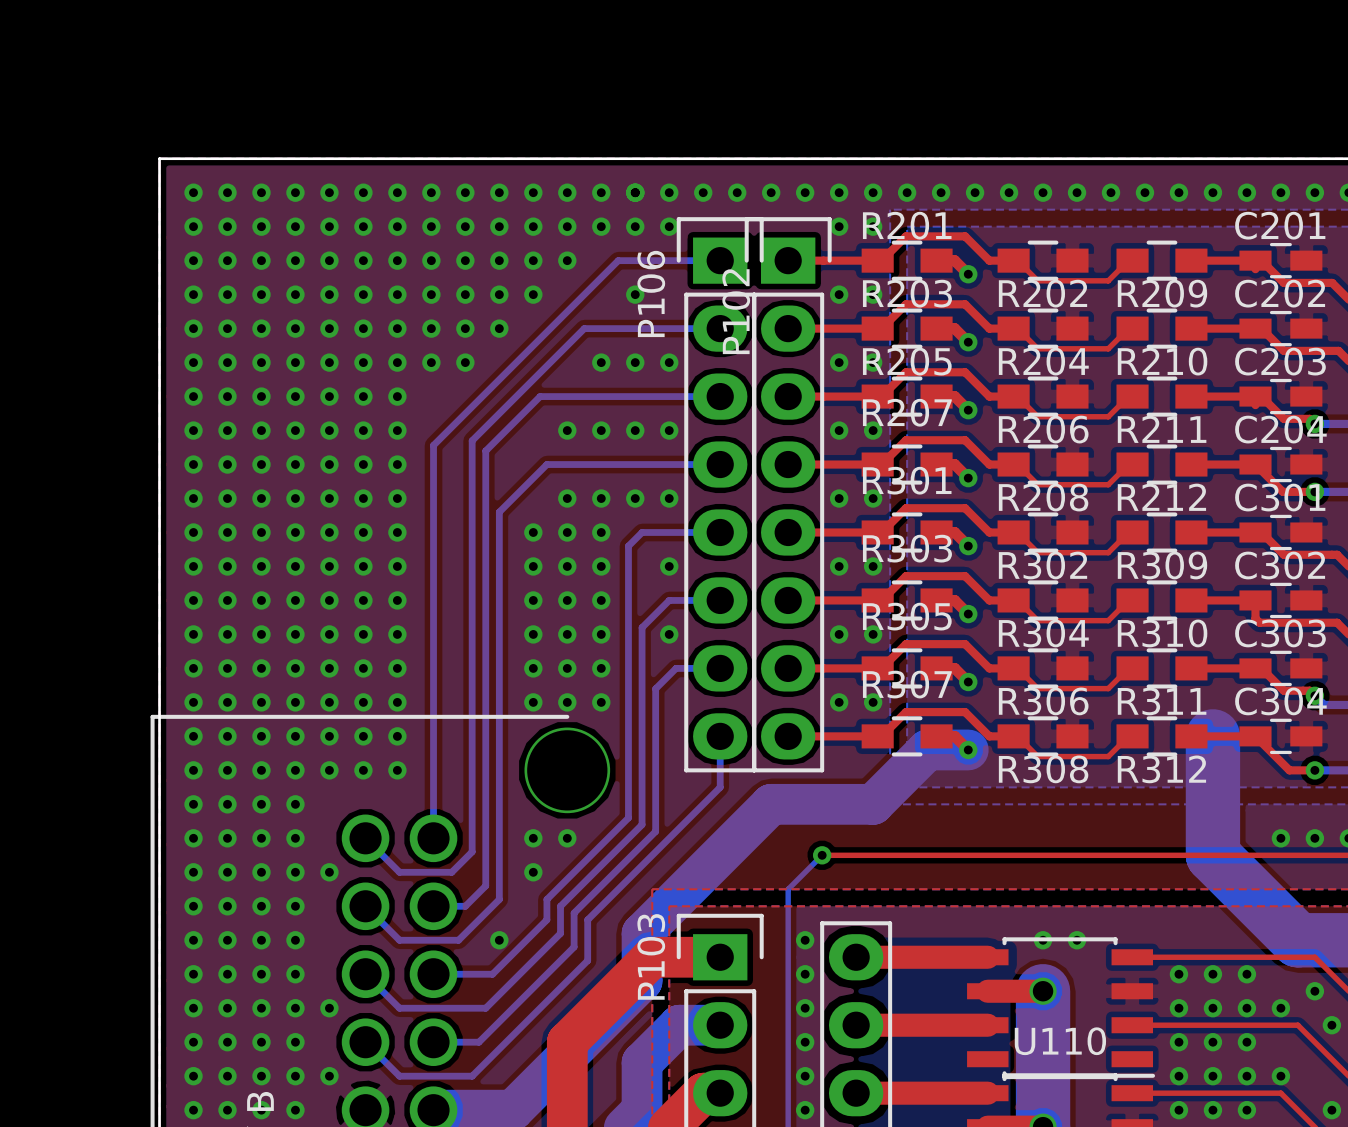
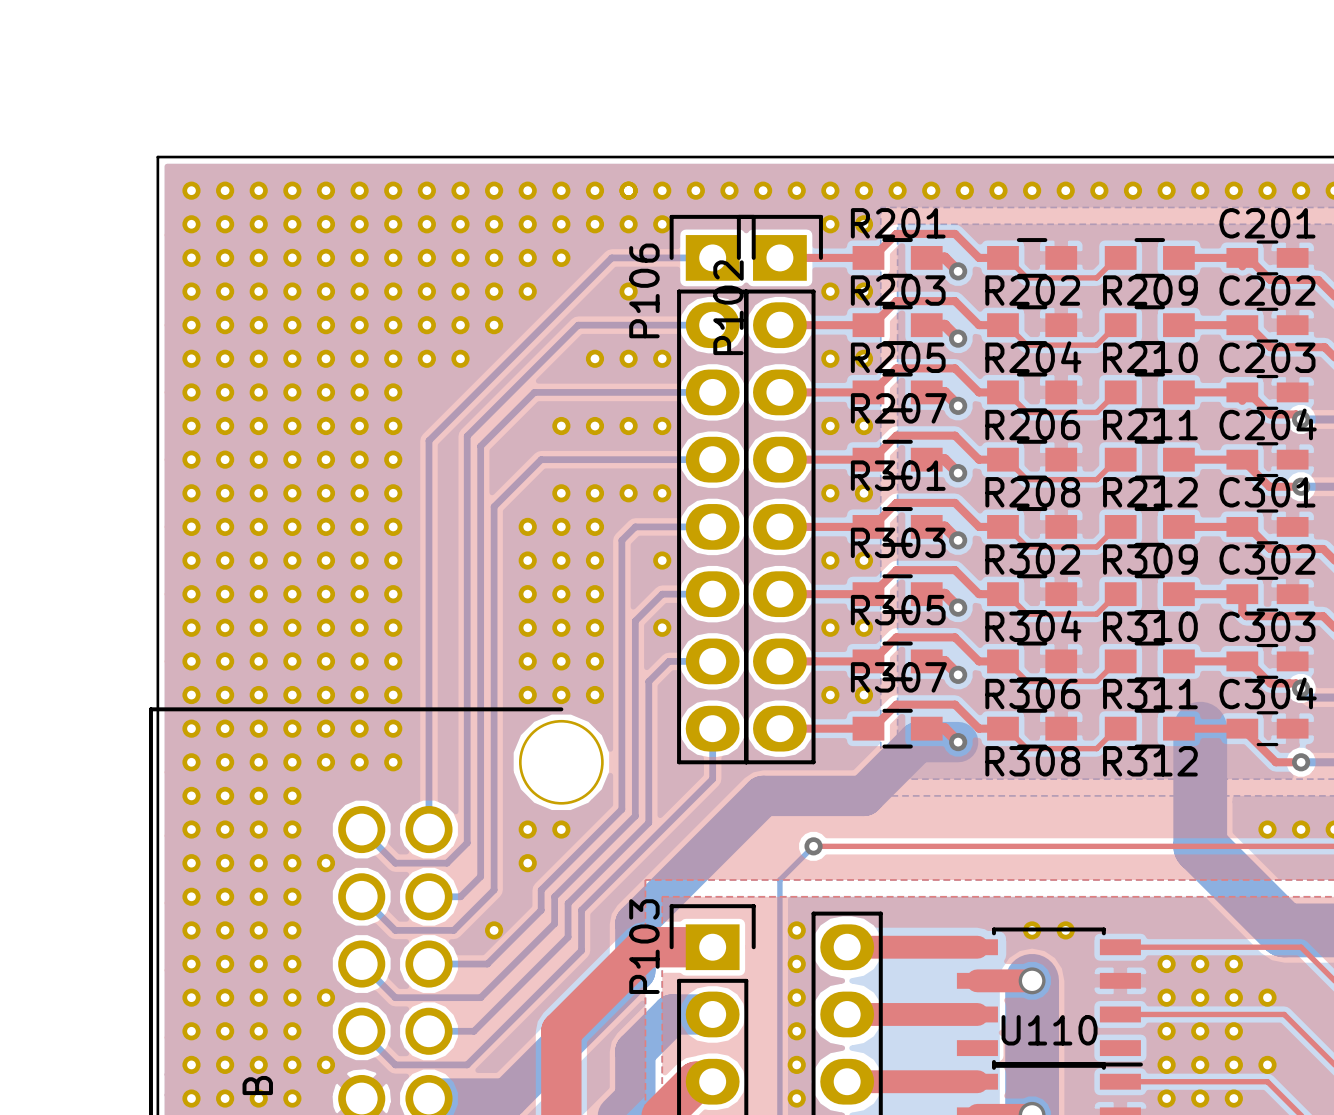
part: (1314, 991) -> none
part: (1331, 1025) -> none
part: (1331, 1110) -> none

